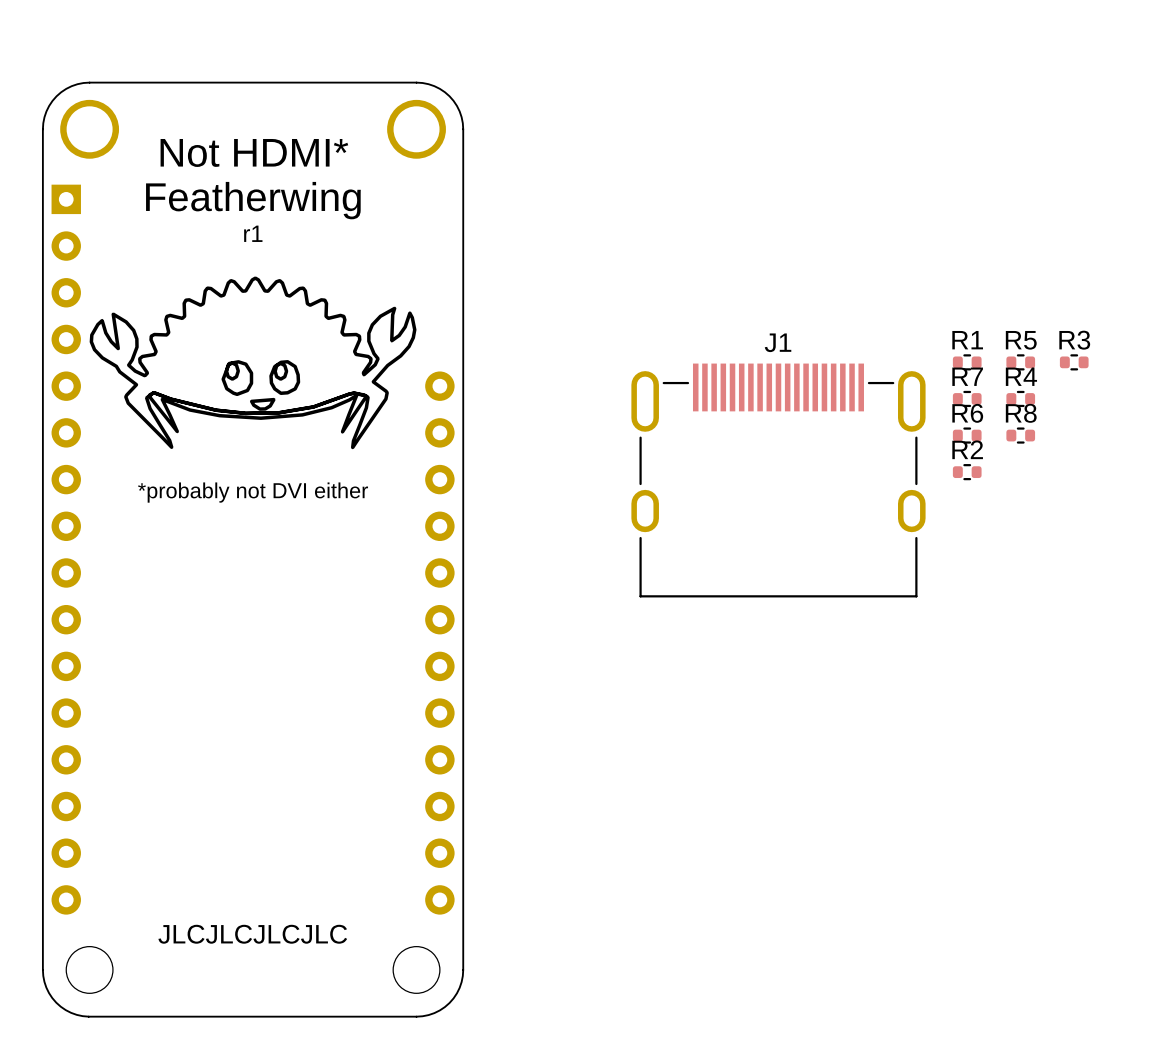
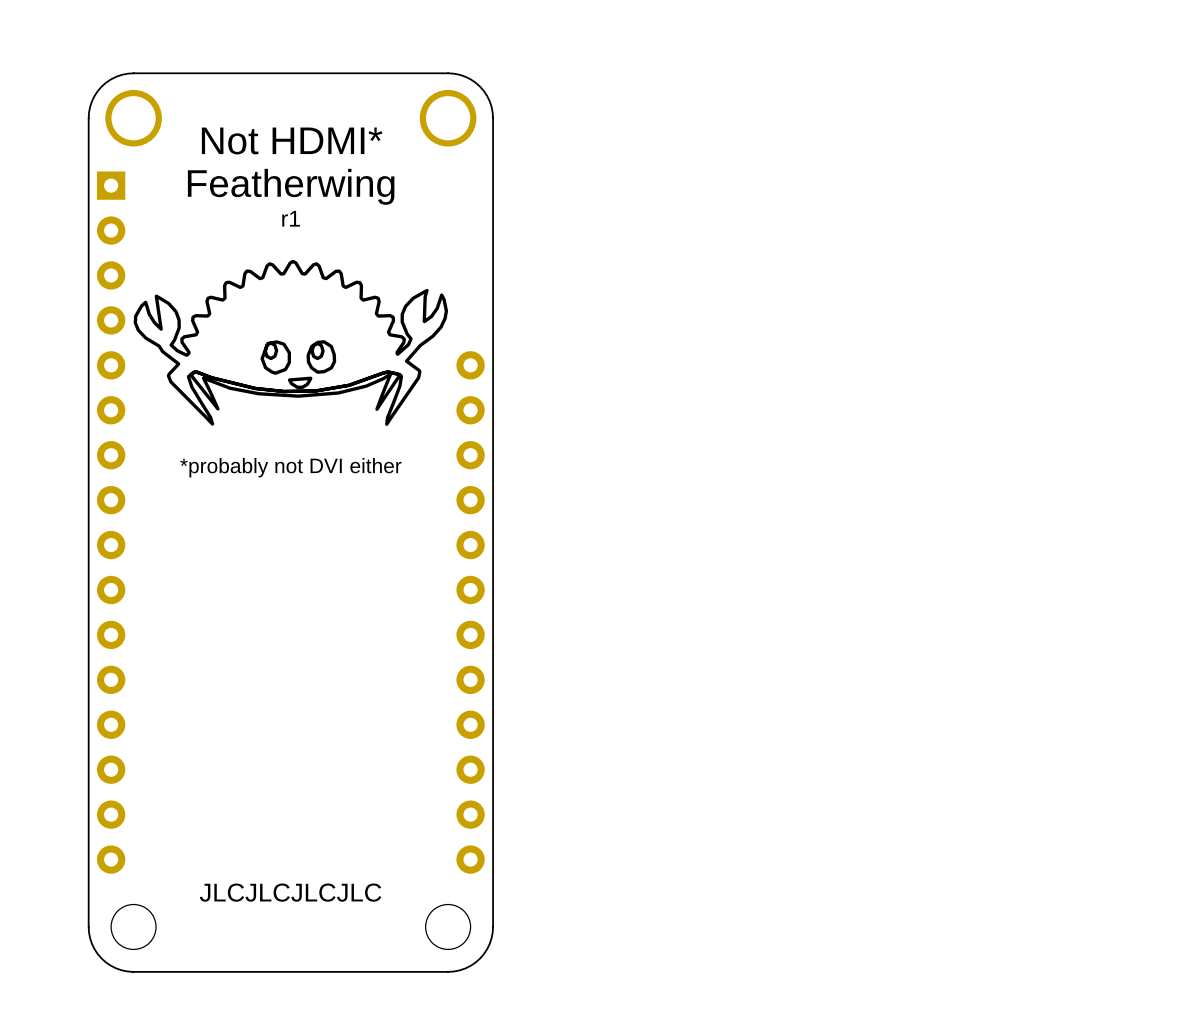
R1: (967, 362) -> none
R5: (1020, 362) -> none
R3: (1074, 362) -> none
R7: (967, 398) -> none
R4: (1020, 398) -> none
R6: (967, 435) -> none
R8: (1020, 435) -> none
R2: (967, 472) -> none
J1: (778, 480) -> none

